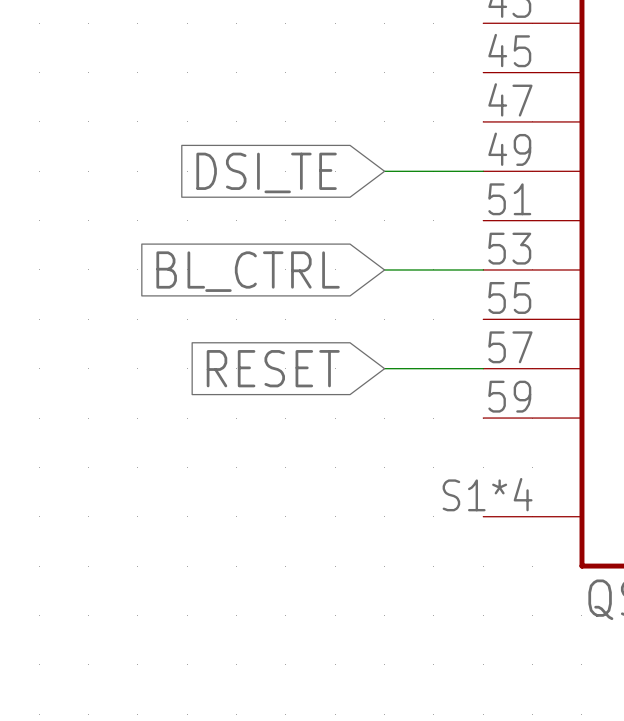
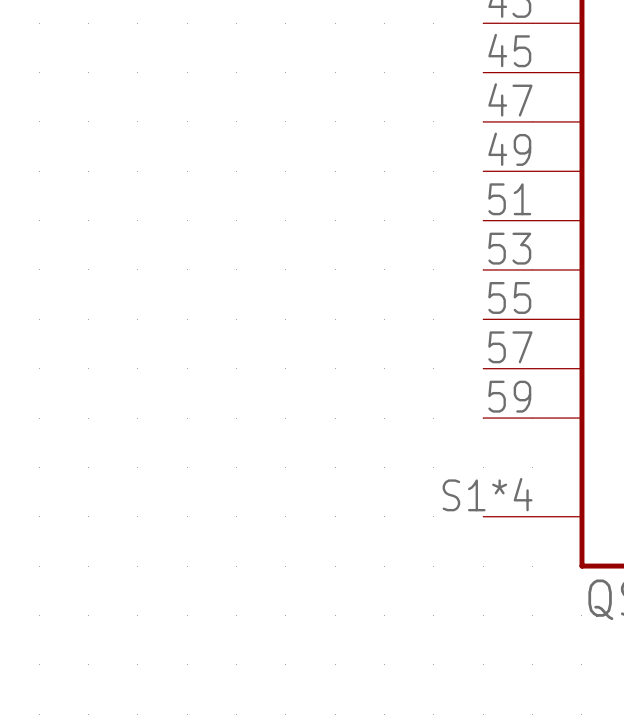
wire: (384, 171) (483, 171) -> none
global label: DSI_TE (266, 172) -> none
wire: (384, 269) (483, 269) -> none
global label: BL_CTRL (248, 271) -> none
global label: RESET (273, 368) -> none
wire: (384, 368) (483, 368) -> none

